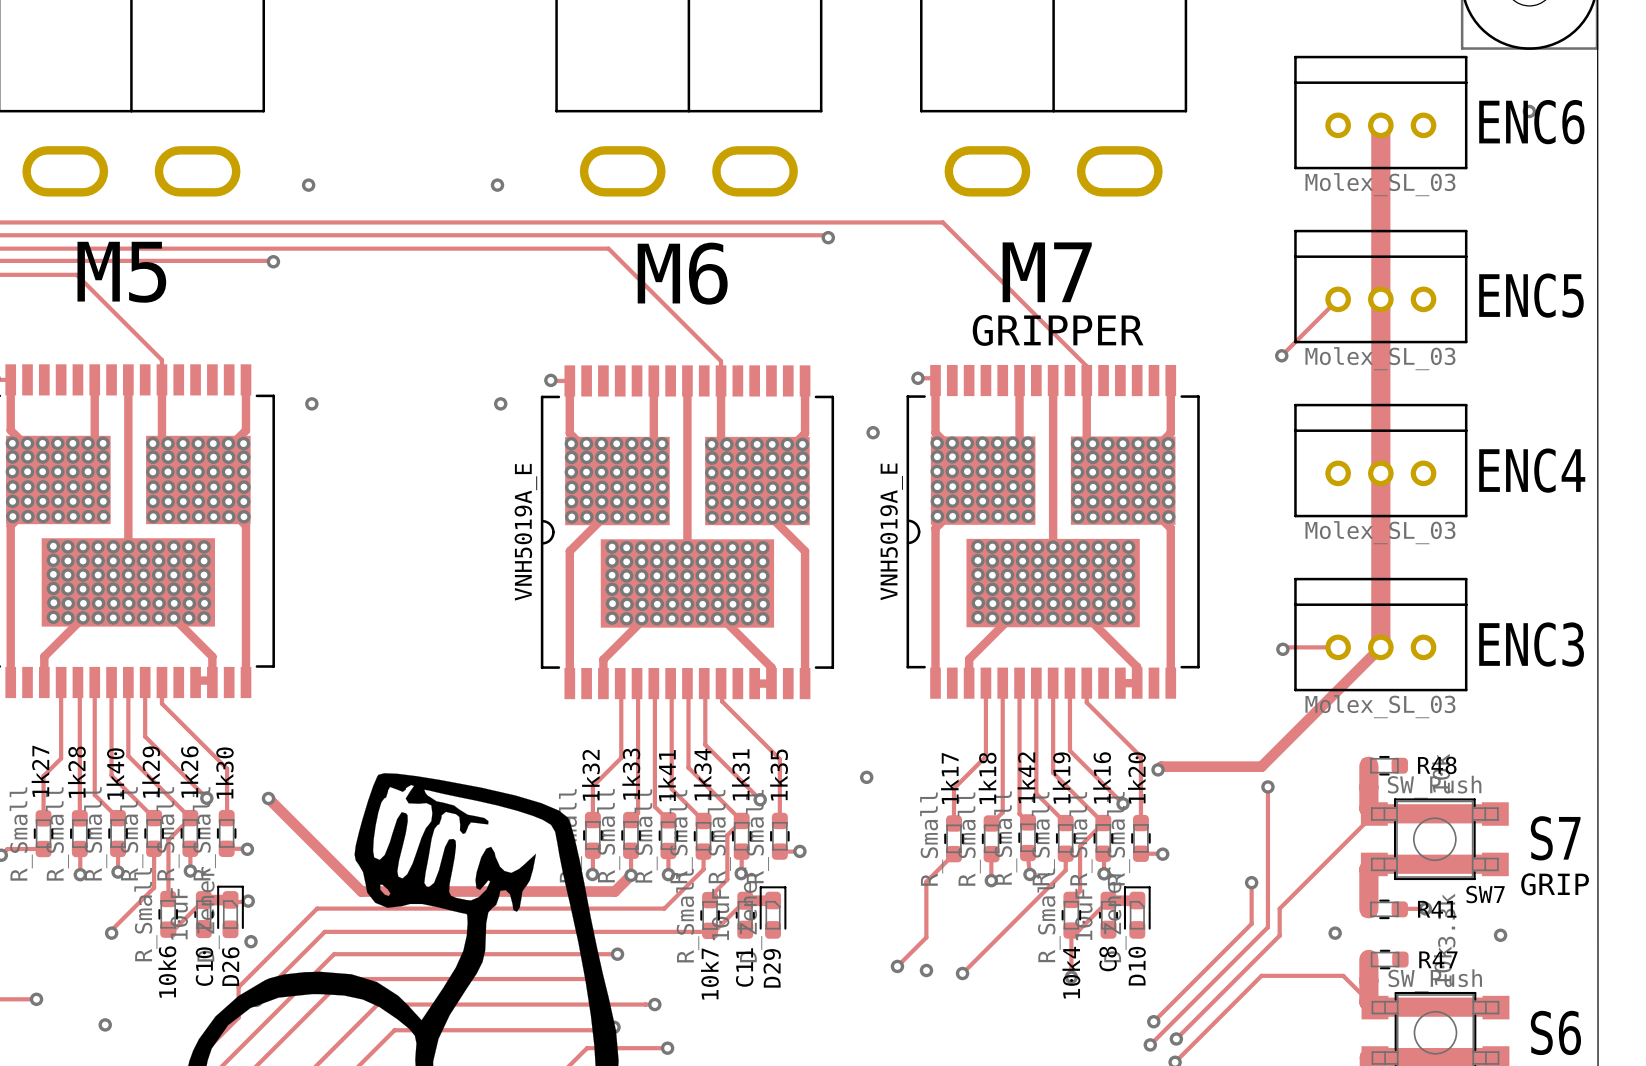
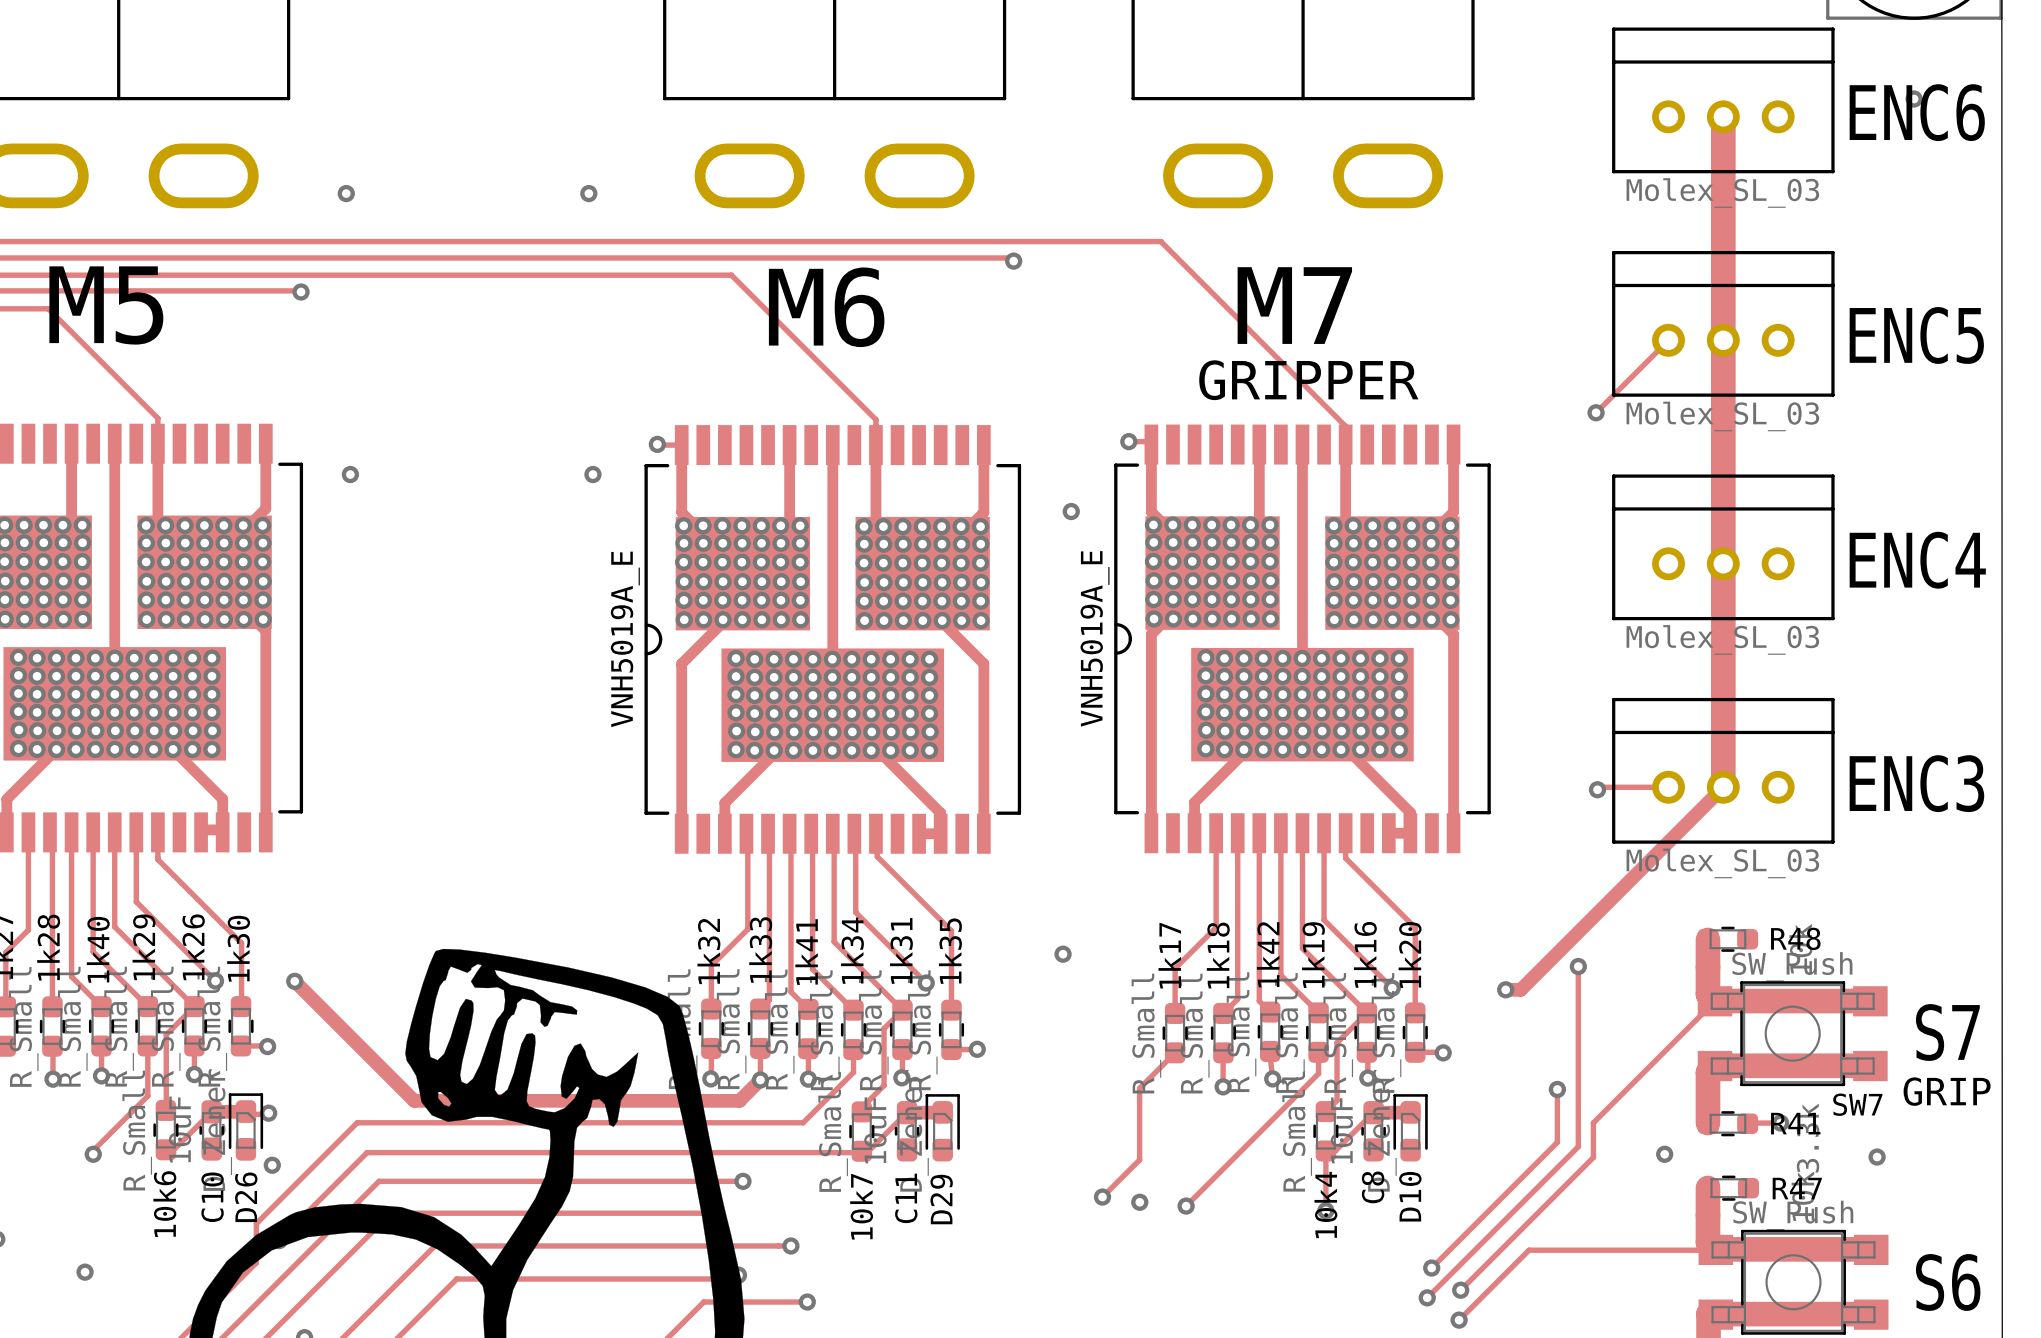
track: (1261, 766) (1161, 766) (1158, 769) -> (1570, 940) (1520, 989) (1505, 989)
via position: (1158, 769) -> (1505, 989)
track: (1374, 1007) (1343, 975) (1261, 975) (1229, 1007) -> (1715, 1249) (1529, 1250)

